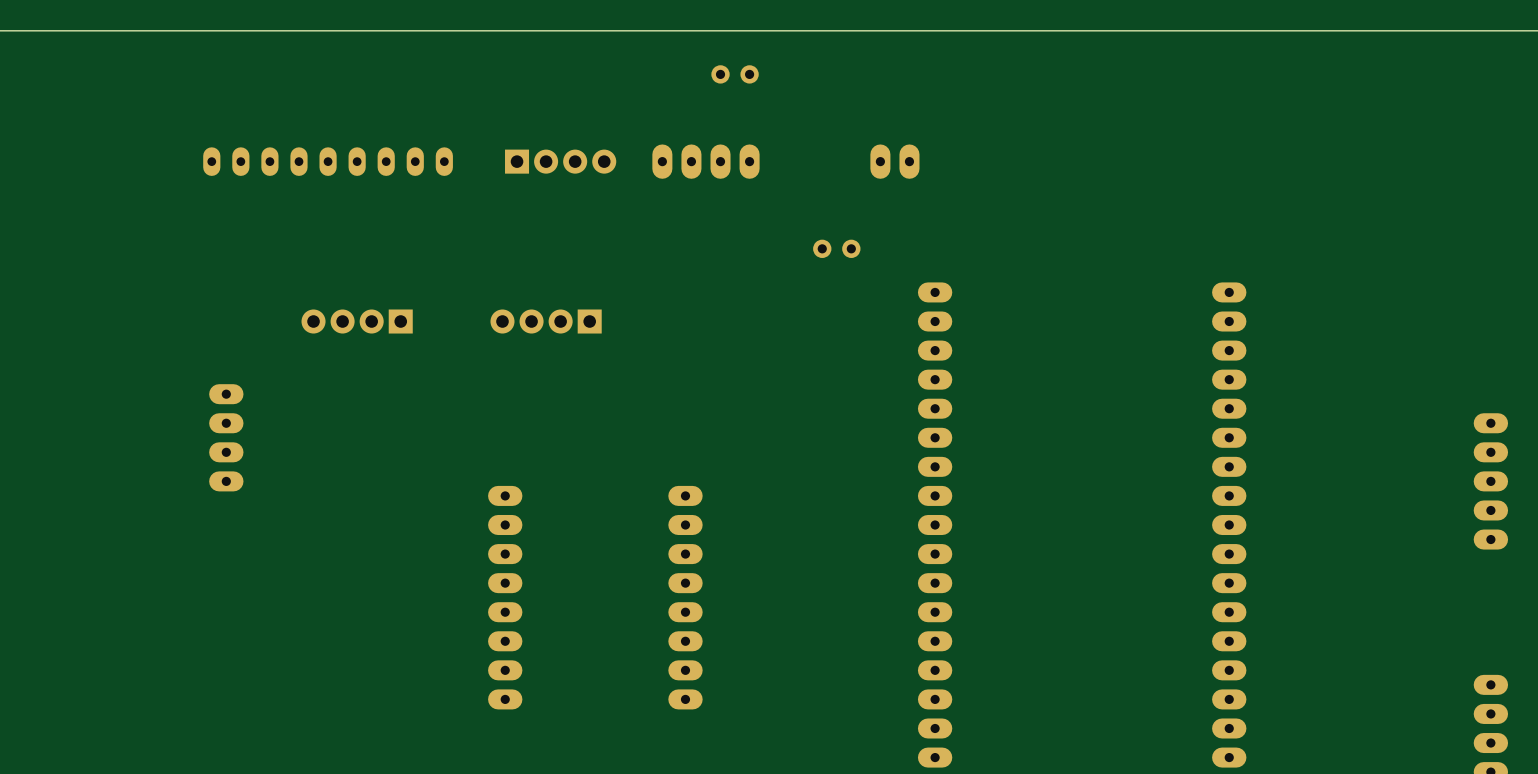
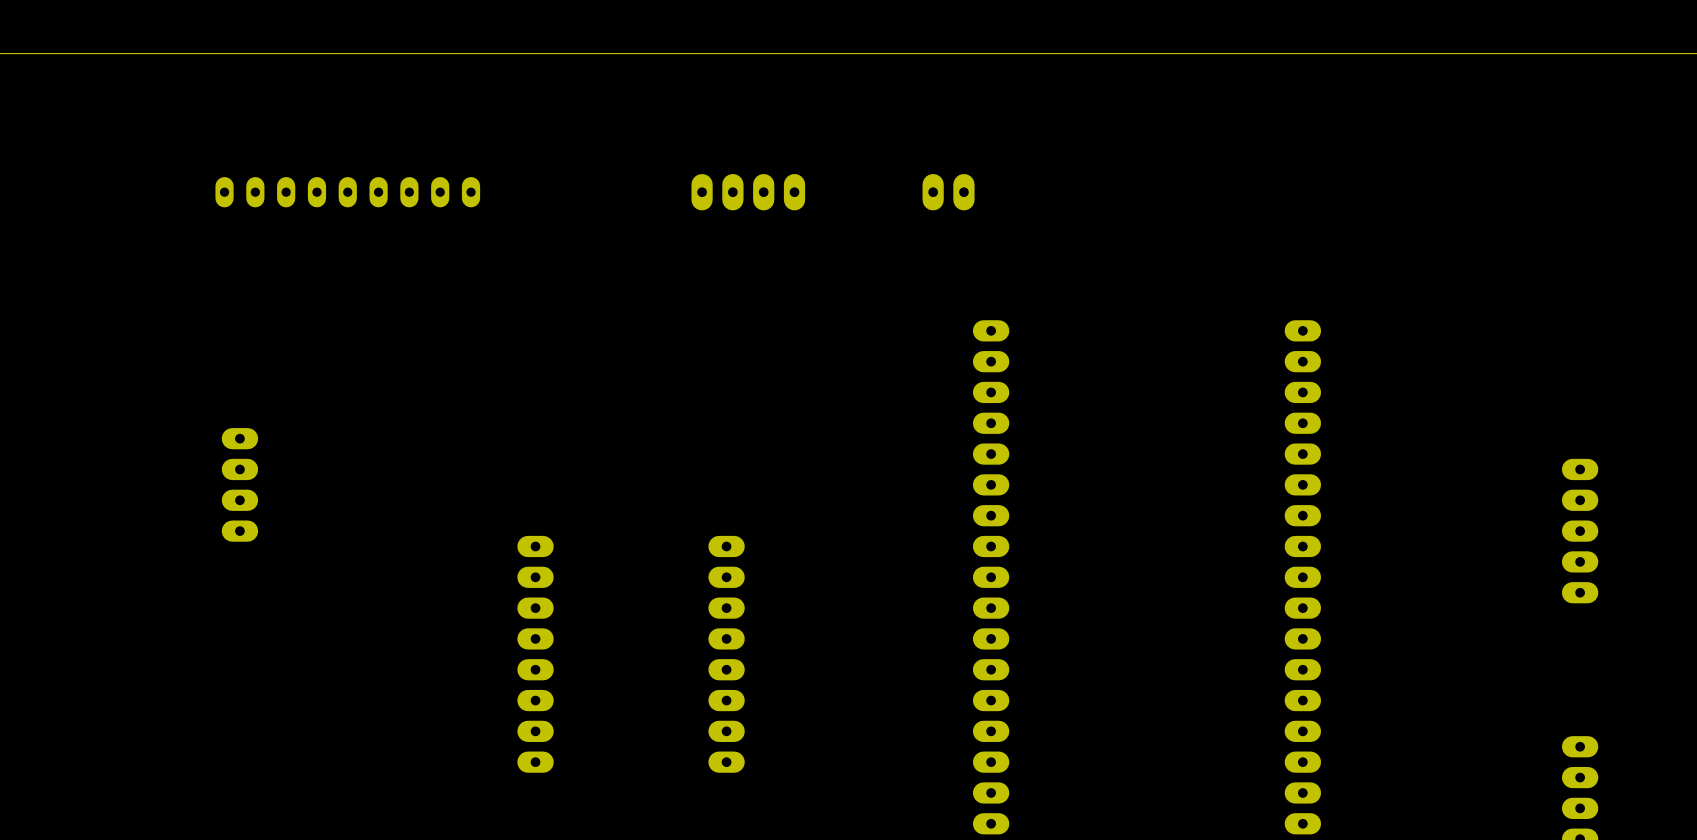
part: (735, 74) -> none
part: (560, 161) -> none
part: (836, 248) -> none
part: (357, 321) -> none
part: (546, 321) -> none

